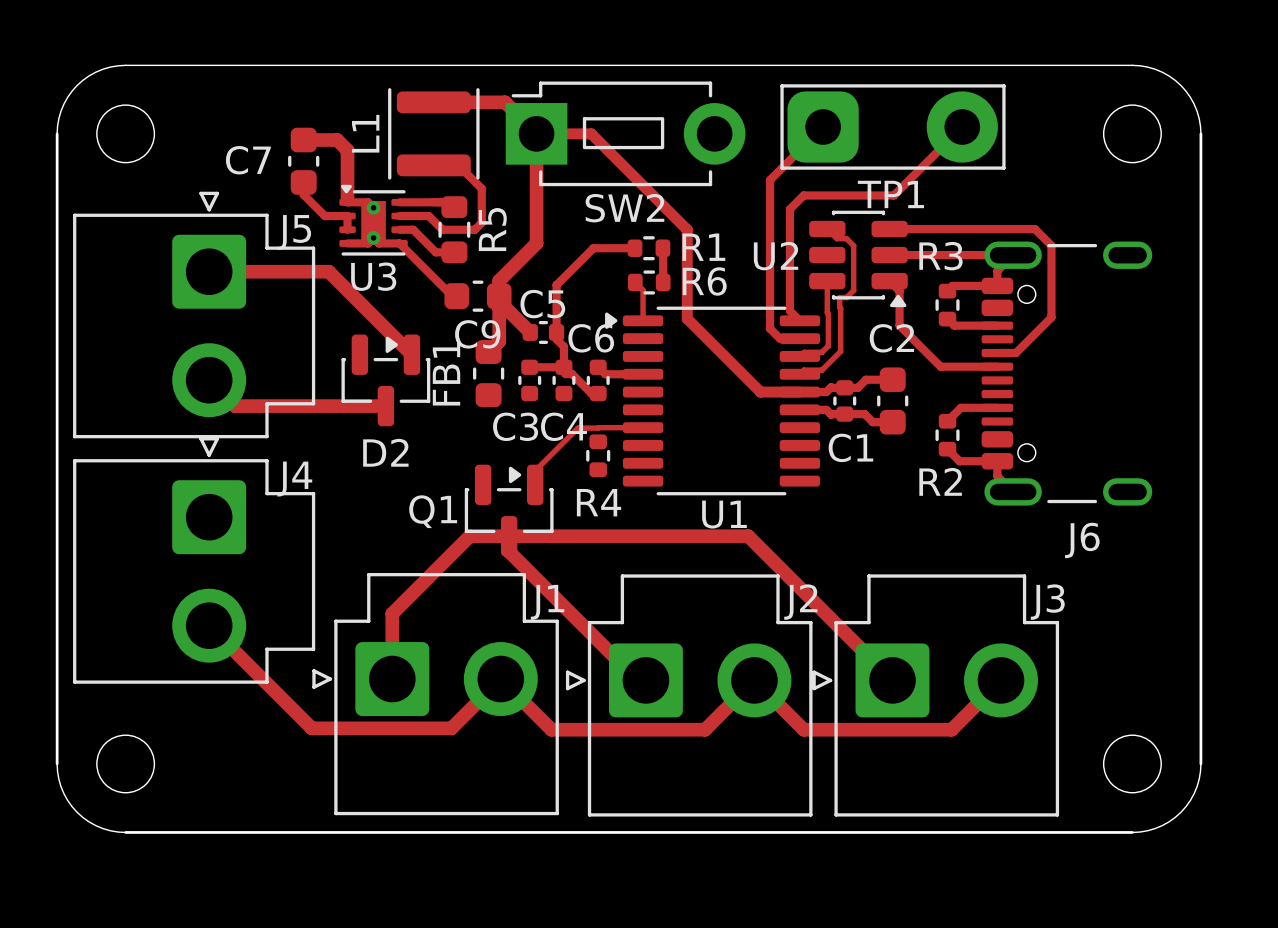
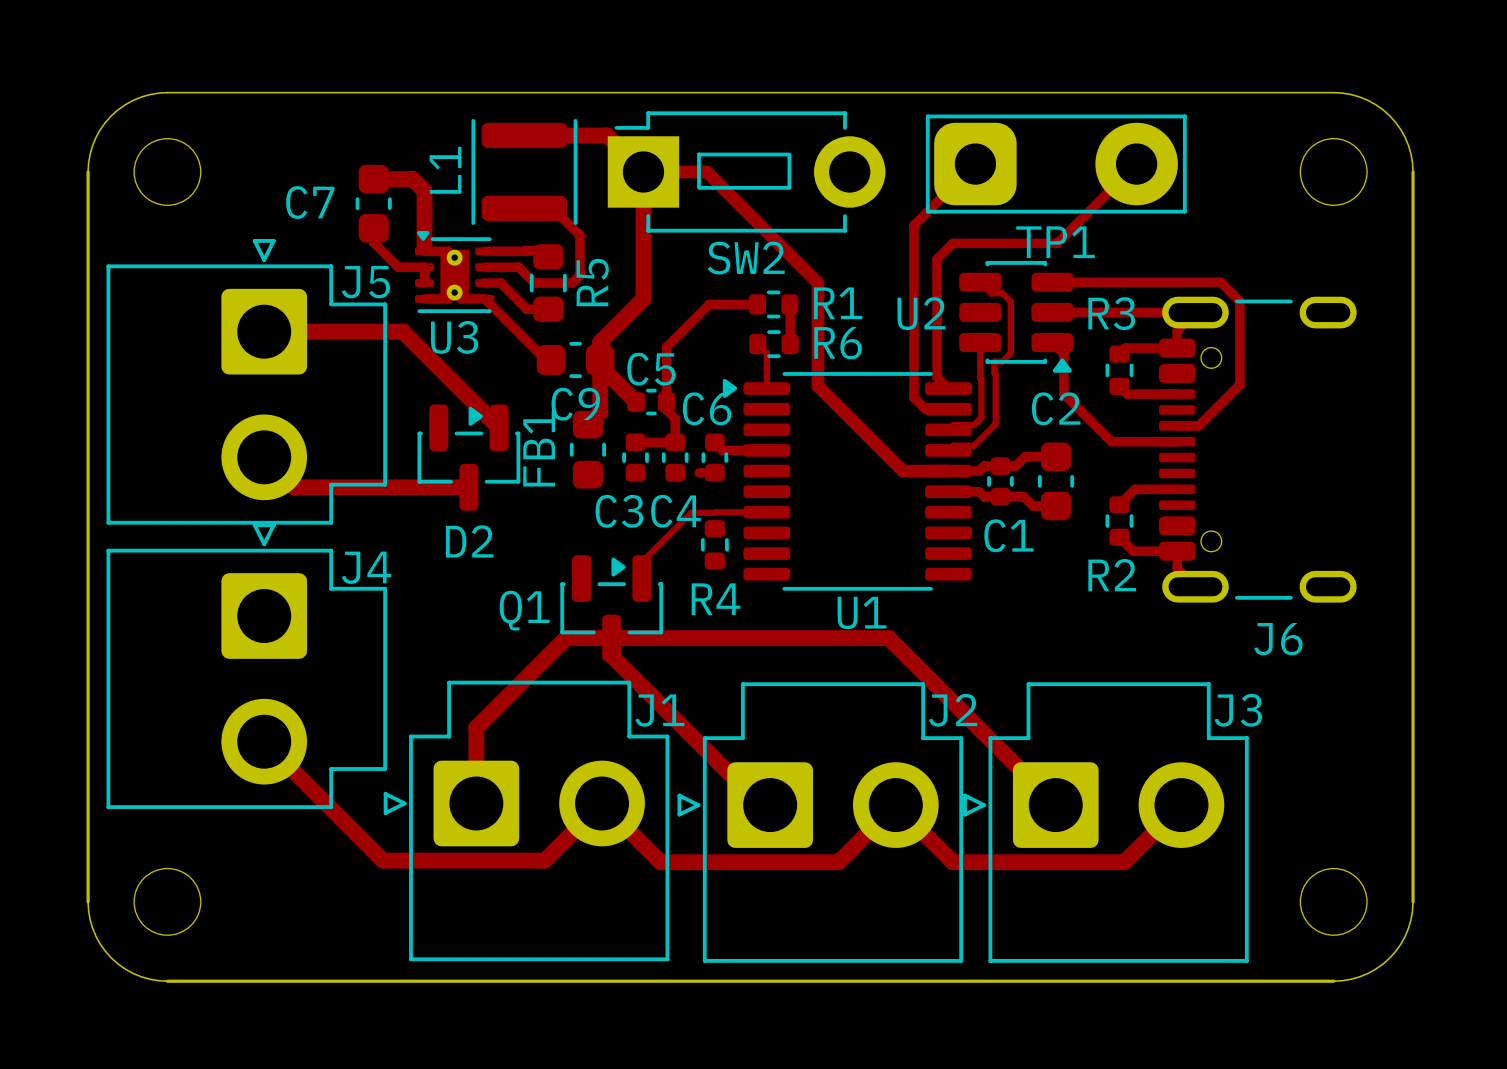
track: (565, 374) (572, 374) (591, 393) -> (699, 472) (707, 472)

